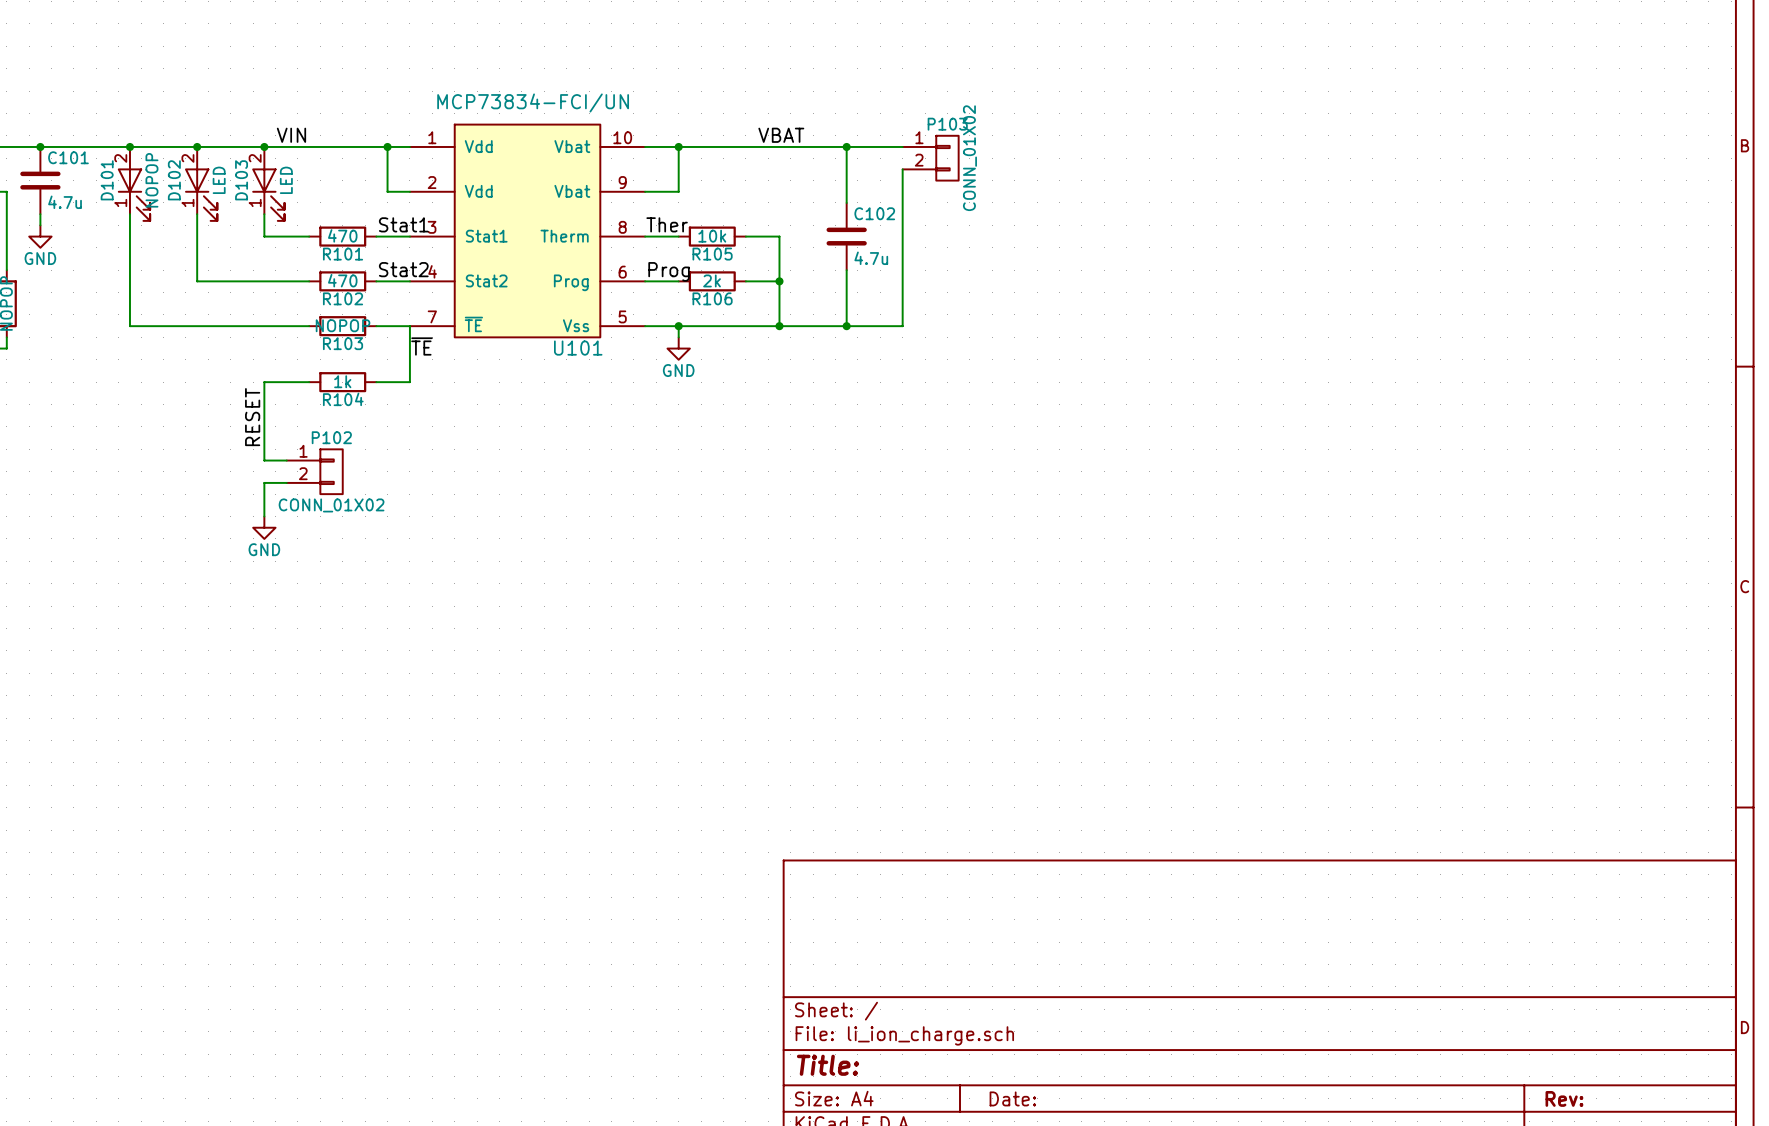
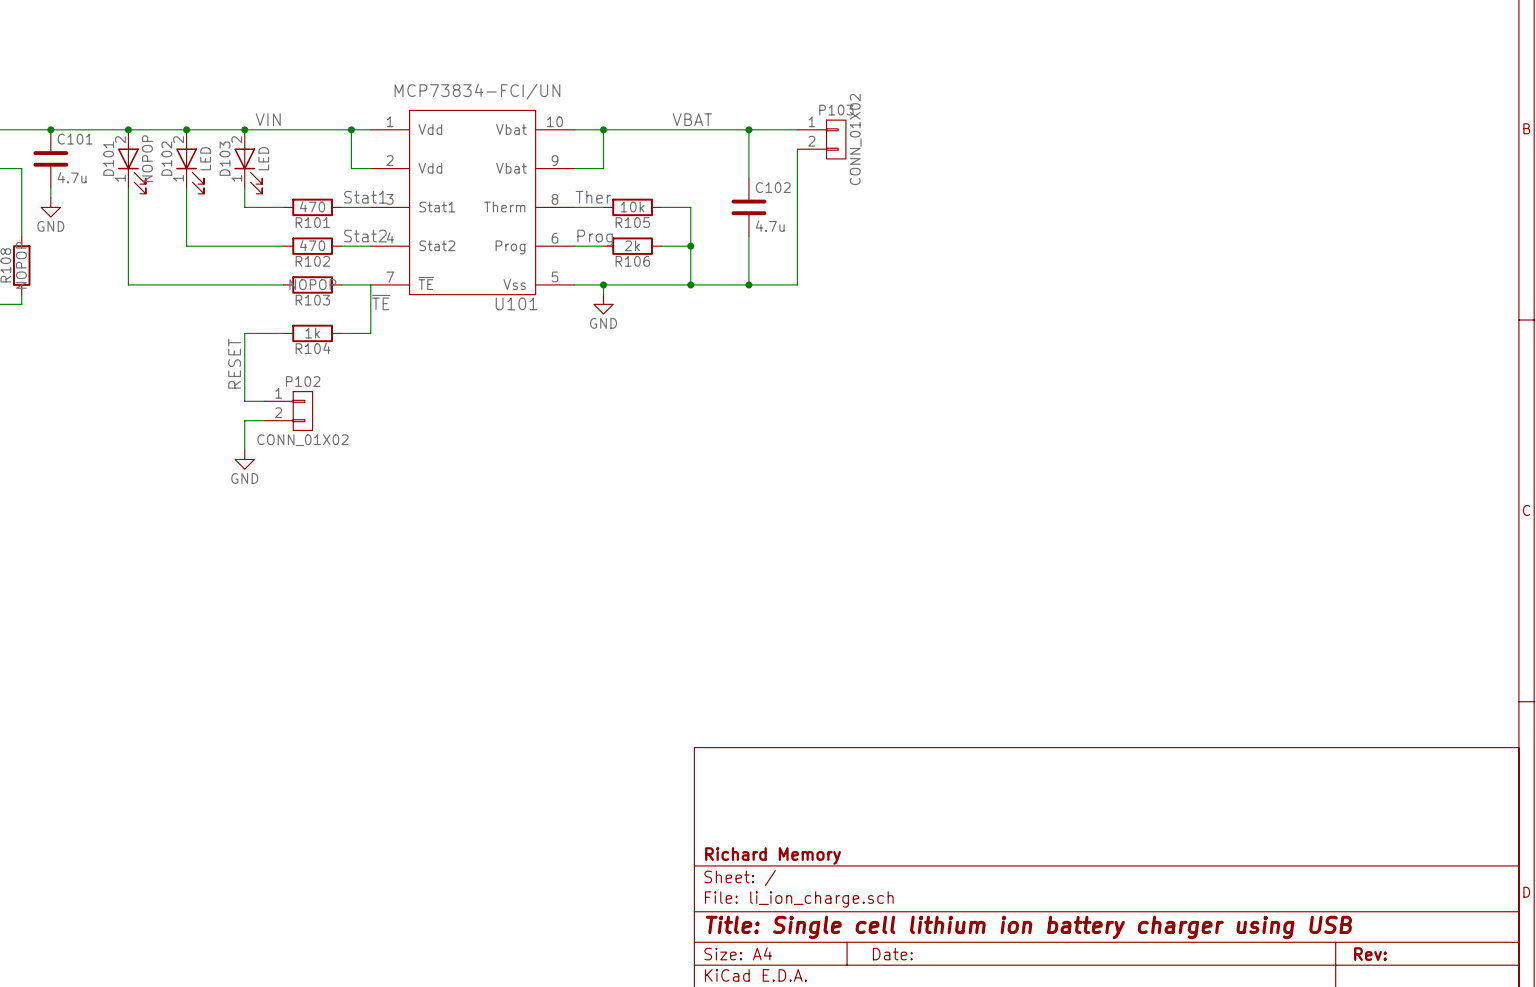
title block: none -> Richard Memory (773, 855)
title block: Title: (828, 1065) -> Title: Single cell lithium ion battery charger using USB (1028, 927)

